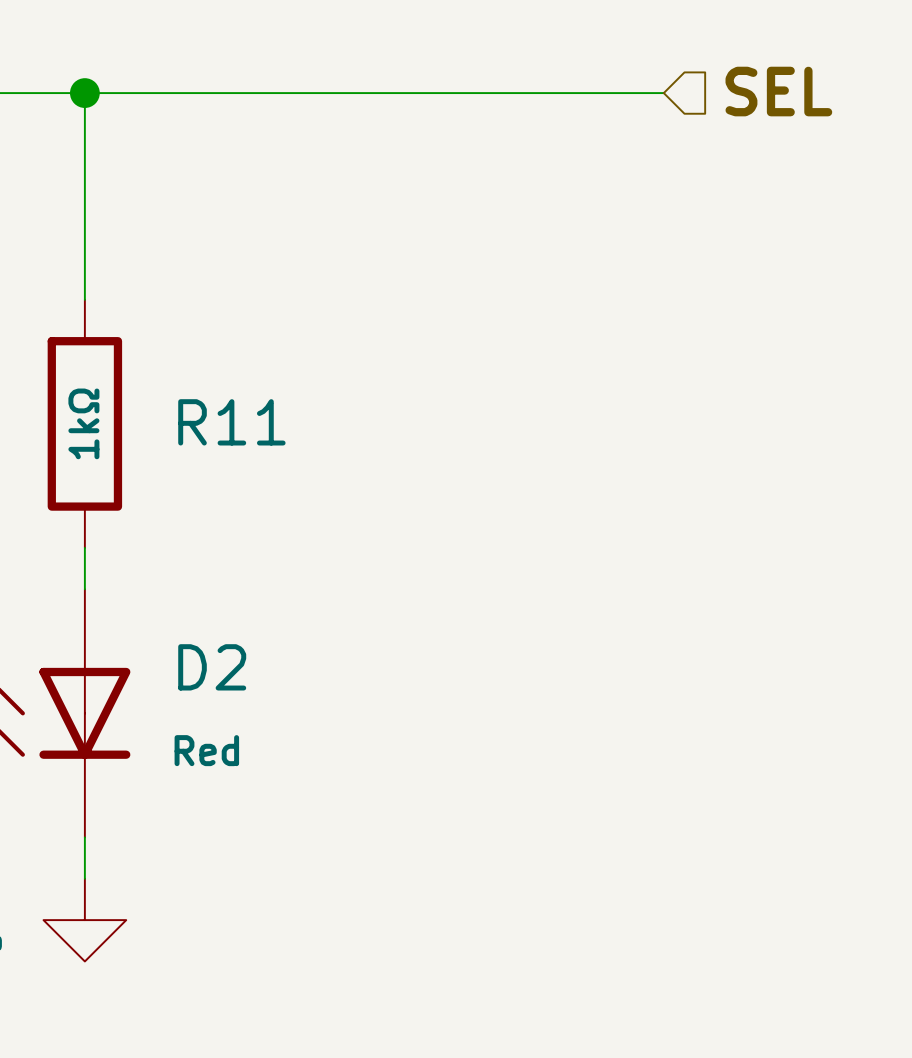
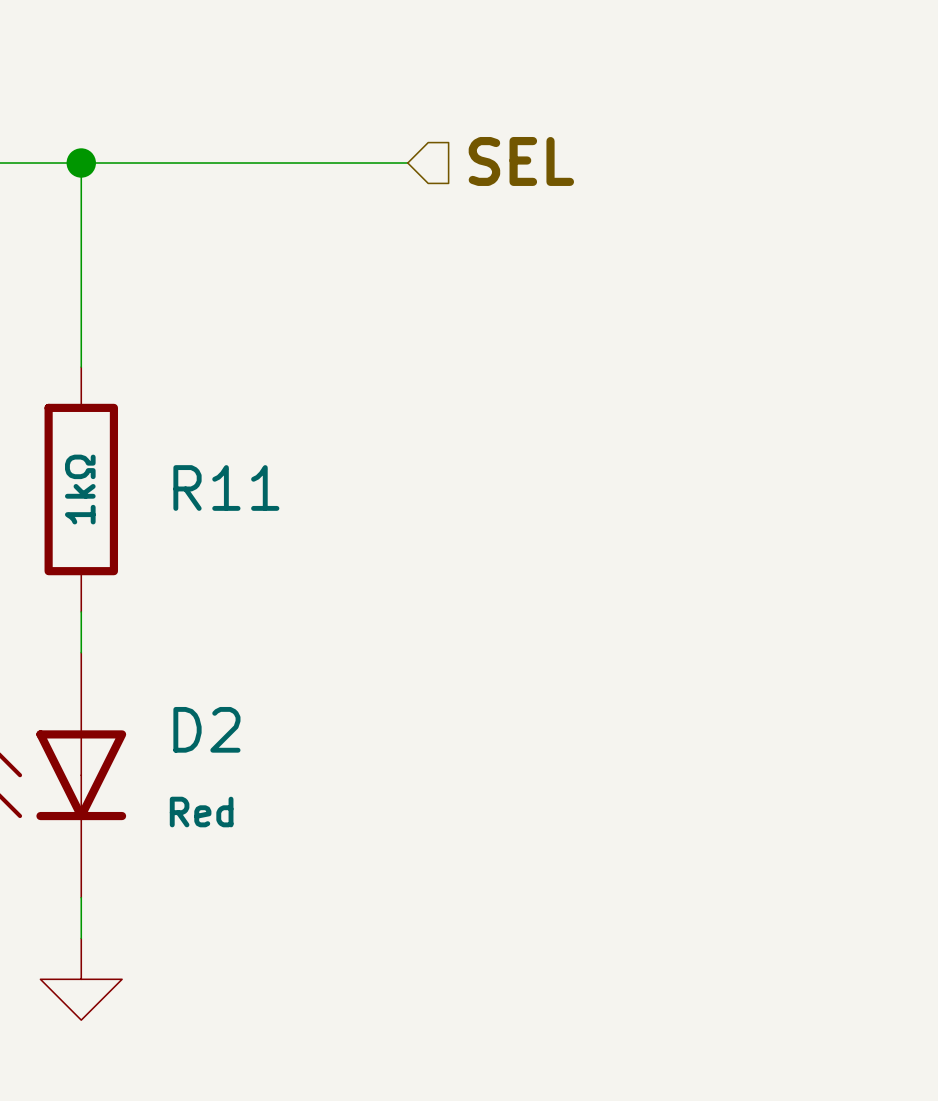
hierarchical label position: SEL (778, 91) -> SEL (521, 161)
wire: (415, 93) (663, 93) -> none

